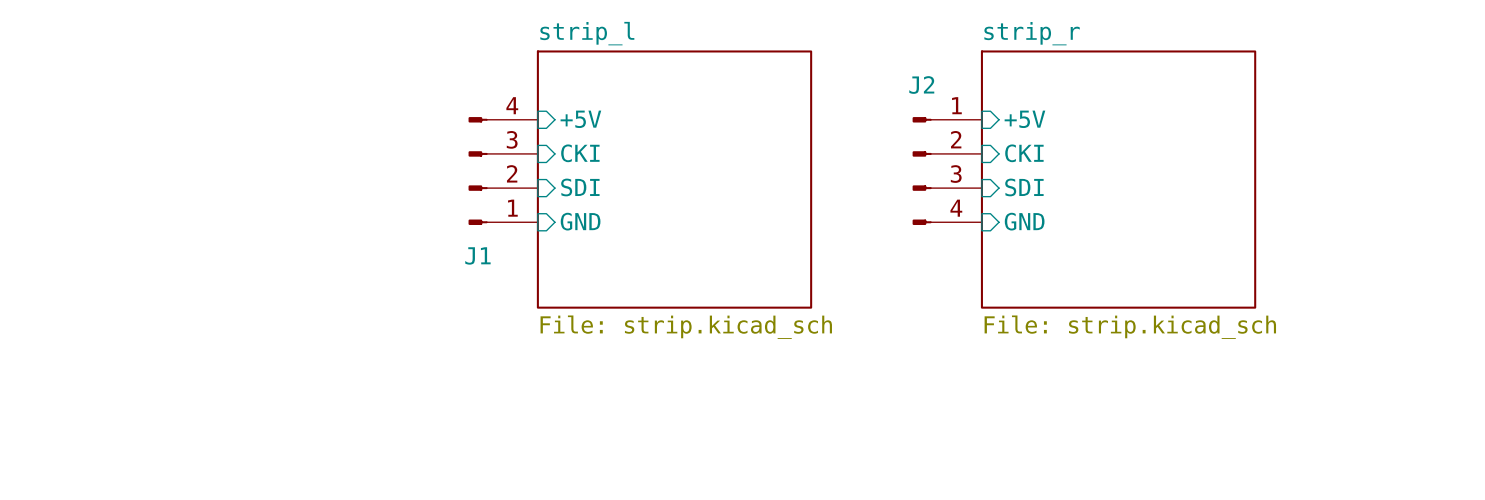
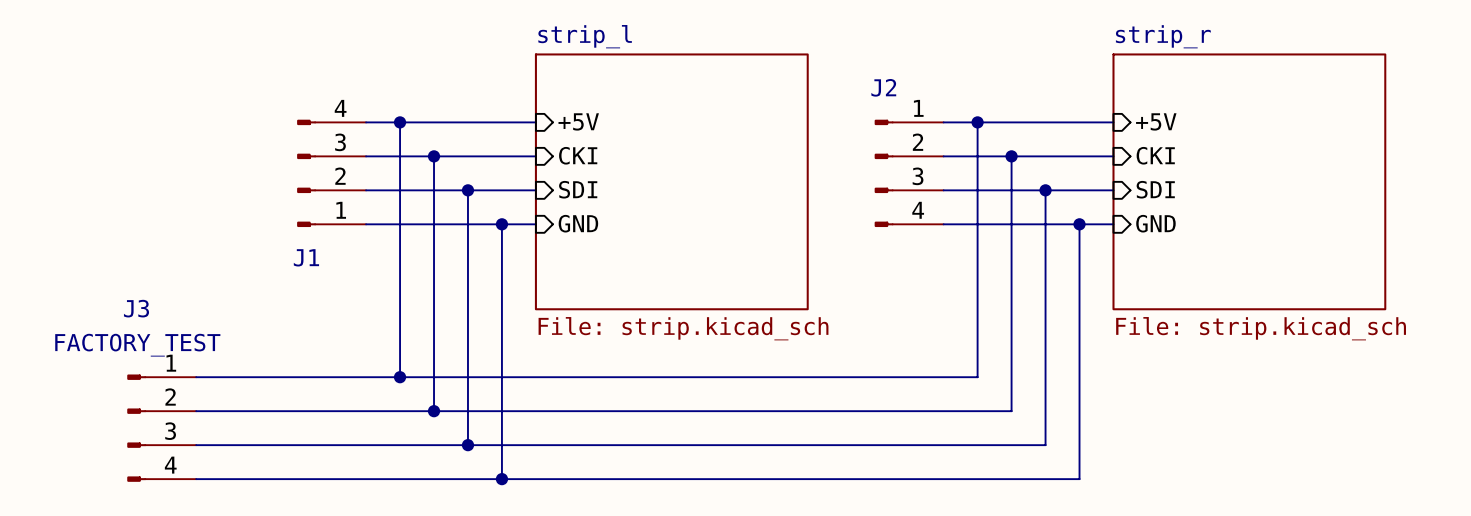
wire: none -> (366, 122) (535, 122)
wire: none -> (400, 122) (400, 377)
junction: none -> (400, 122)
wire: none -> (943, 122) (1113, 122)
wire: none -> (977, 122) (977, 377) (196, 377)
junction: none -> (977, 122)
sheet pin position: +5V (1024, 119) -> +5V (1156, 121)
wire: none -> (366, 156) (535, 156)
wire: none -> (434, 156) (434, 411)
junction: none -> (434, 156)
wire: none -> (943, 156) (1113, 156)
wire: none -> (1011, 156) (1011, 411) (196, 411)
junction: none -> (1011, 156)
sheet pin position: CKI (1024, 153) -> CKI (1155, 155)
J1 position: (503, 171) -> (331, 173)
J2 position: (947, 171) -> (909, 173)
sheet strip_r position: (1118, 179) -> (1249, 181)
sheet pin position: SDI (1024, 187) -> SDI (1155, 189)
wire: none -> (366, 190) (535, 190)
wire: none -> (467, 190) (467, 445)
junction: none -> (467, 190)
wire: none -> (943, 190) (1113, 190)
wire: none -> (1045, 190) (1045, 445) (196, 445)
junction: none -> (1045, 190)
sheet pin position: GND (1024, 221) -> GND (1155, 223)
wire: none -> (366, 224) (535, 224)
wire: none -> (501, 224) (501, 479)
junction: none -> (501, 224)
wire: none -> (943, 224) (1113, 224)
wire: none -> (1079, 224) (1079, 479) (196, 479)
junction: none -> (1079, 224)
junction: none -> (400, 377)
junction: none -> (434, 411)
J3: none -> FACTORY_TEST (161, 428)
junction: none -> (467, 445)
junction: none -> (501, 479)

